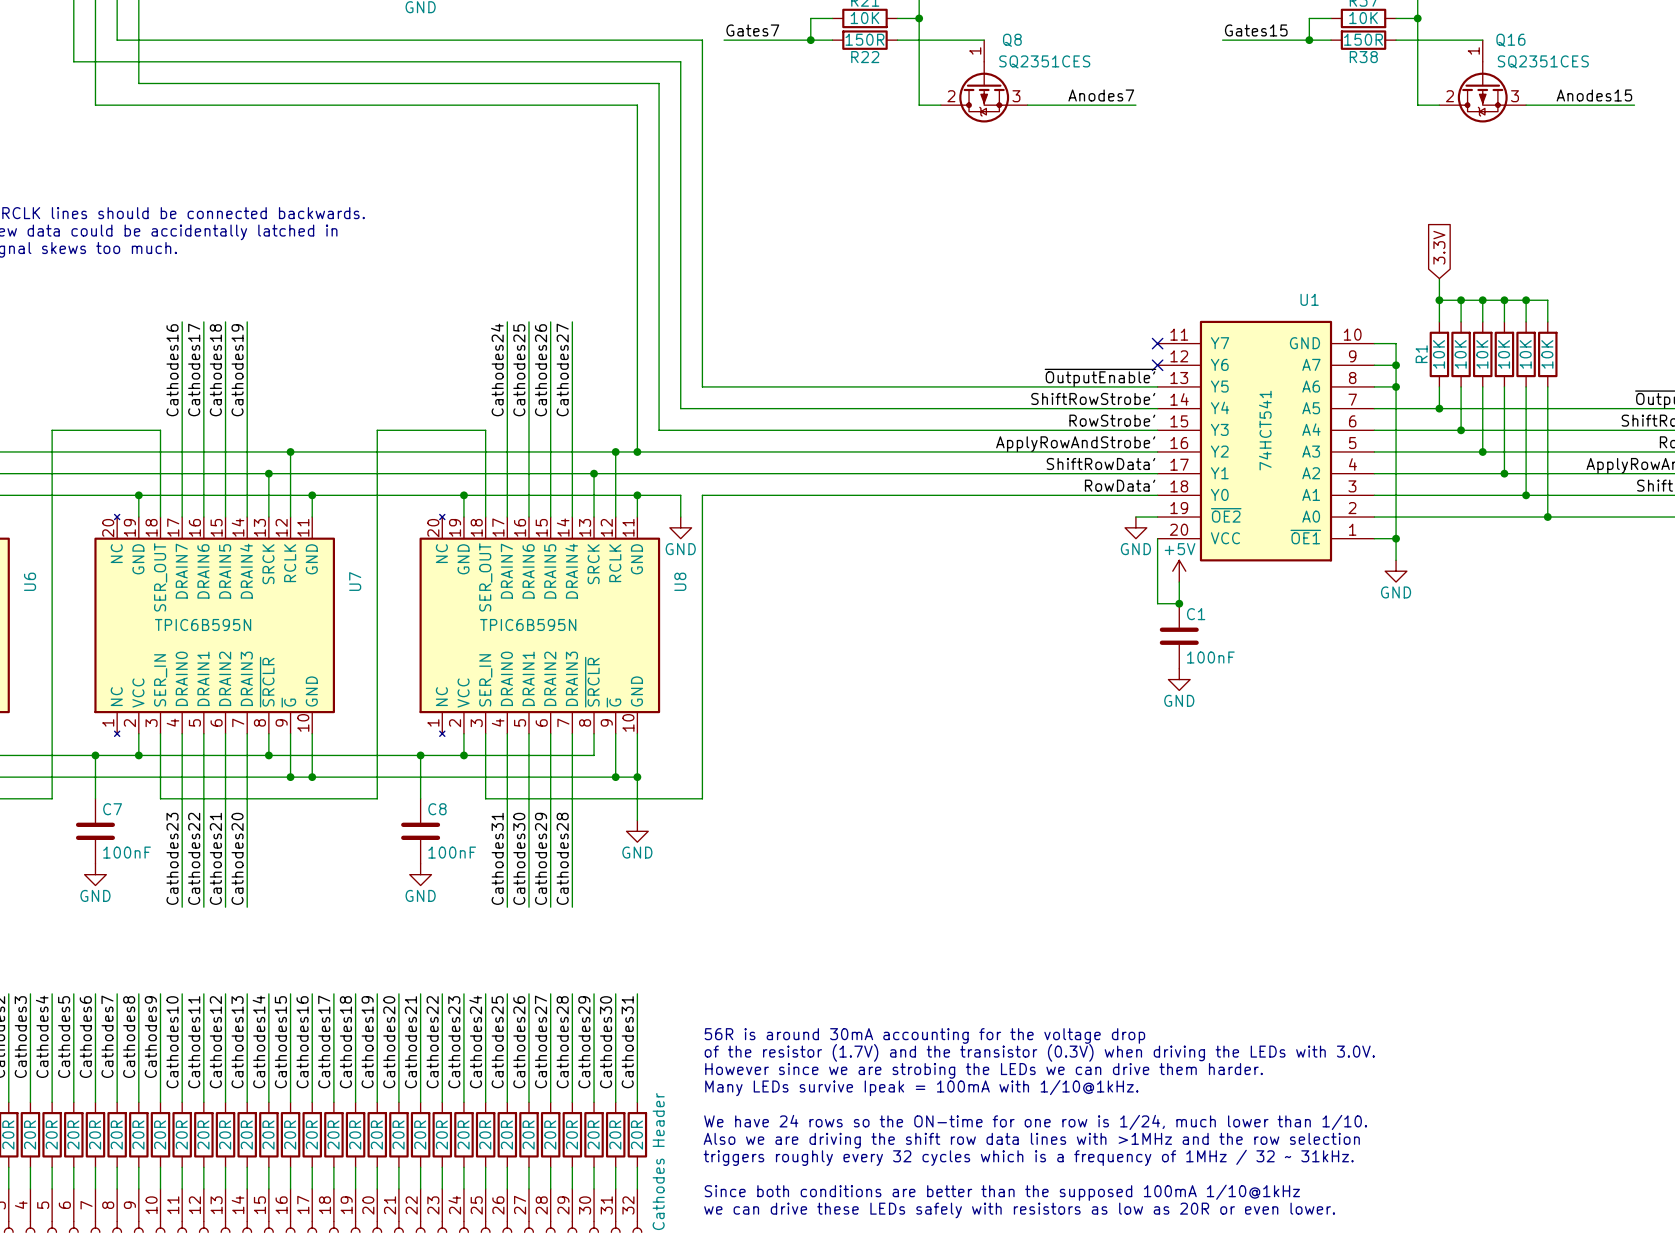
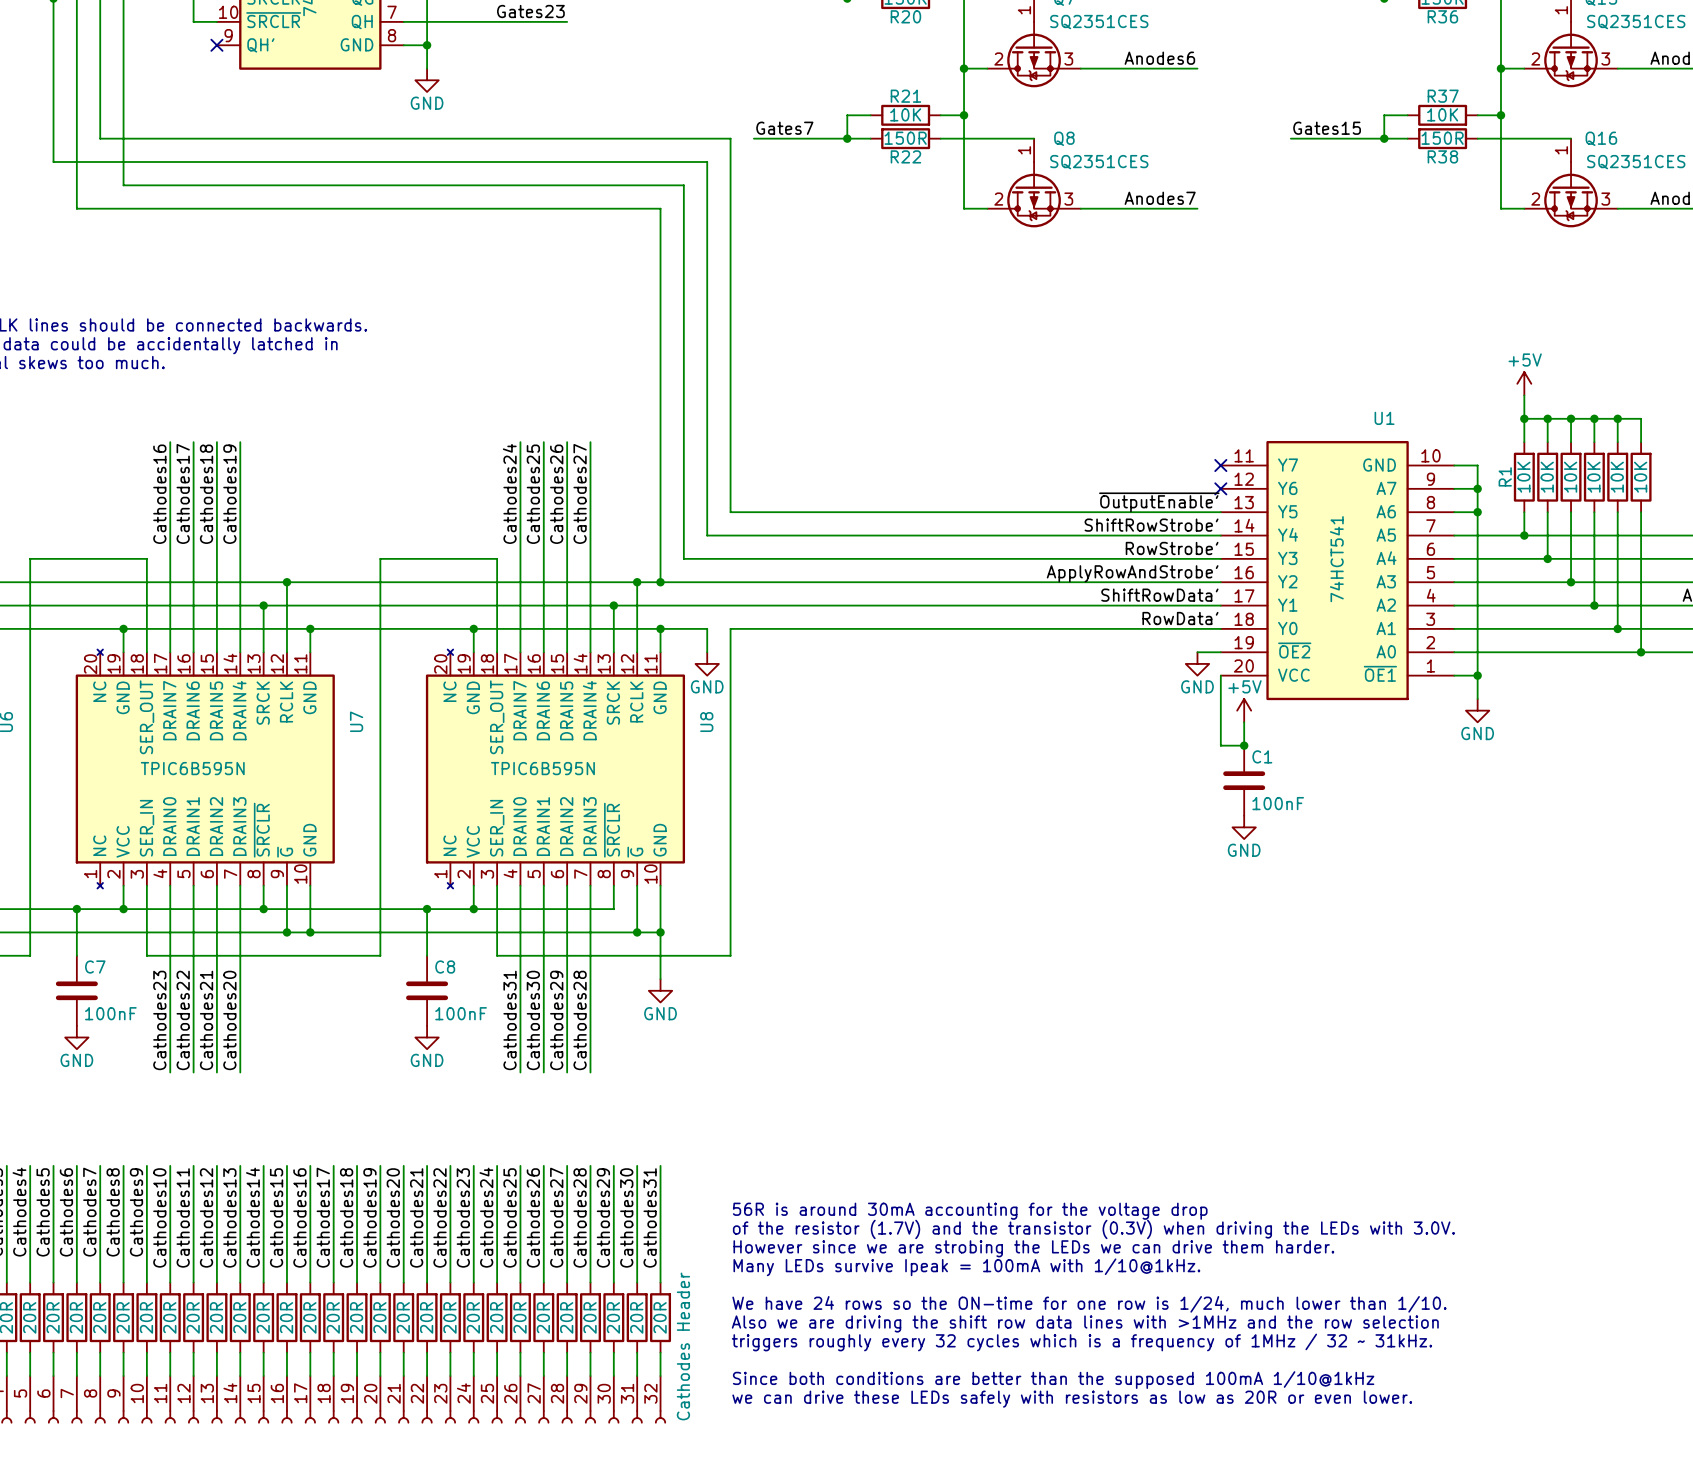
global label: 3.3V (1439, 247) -> none
power symbol: none -> +5V (1524, 383)

